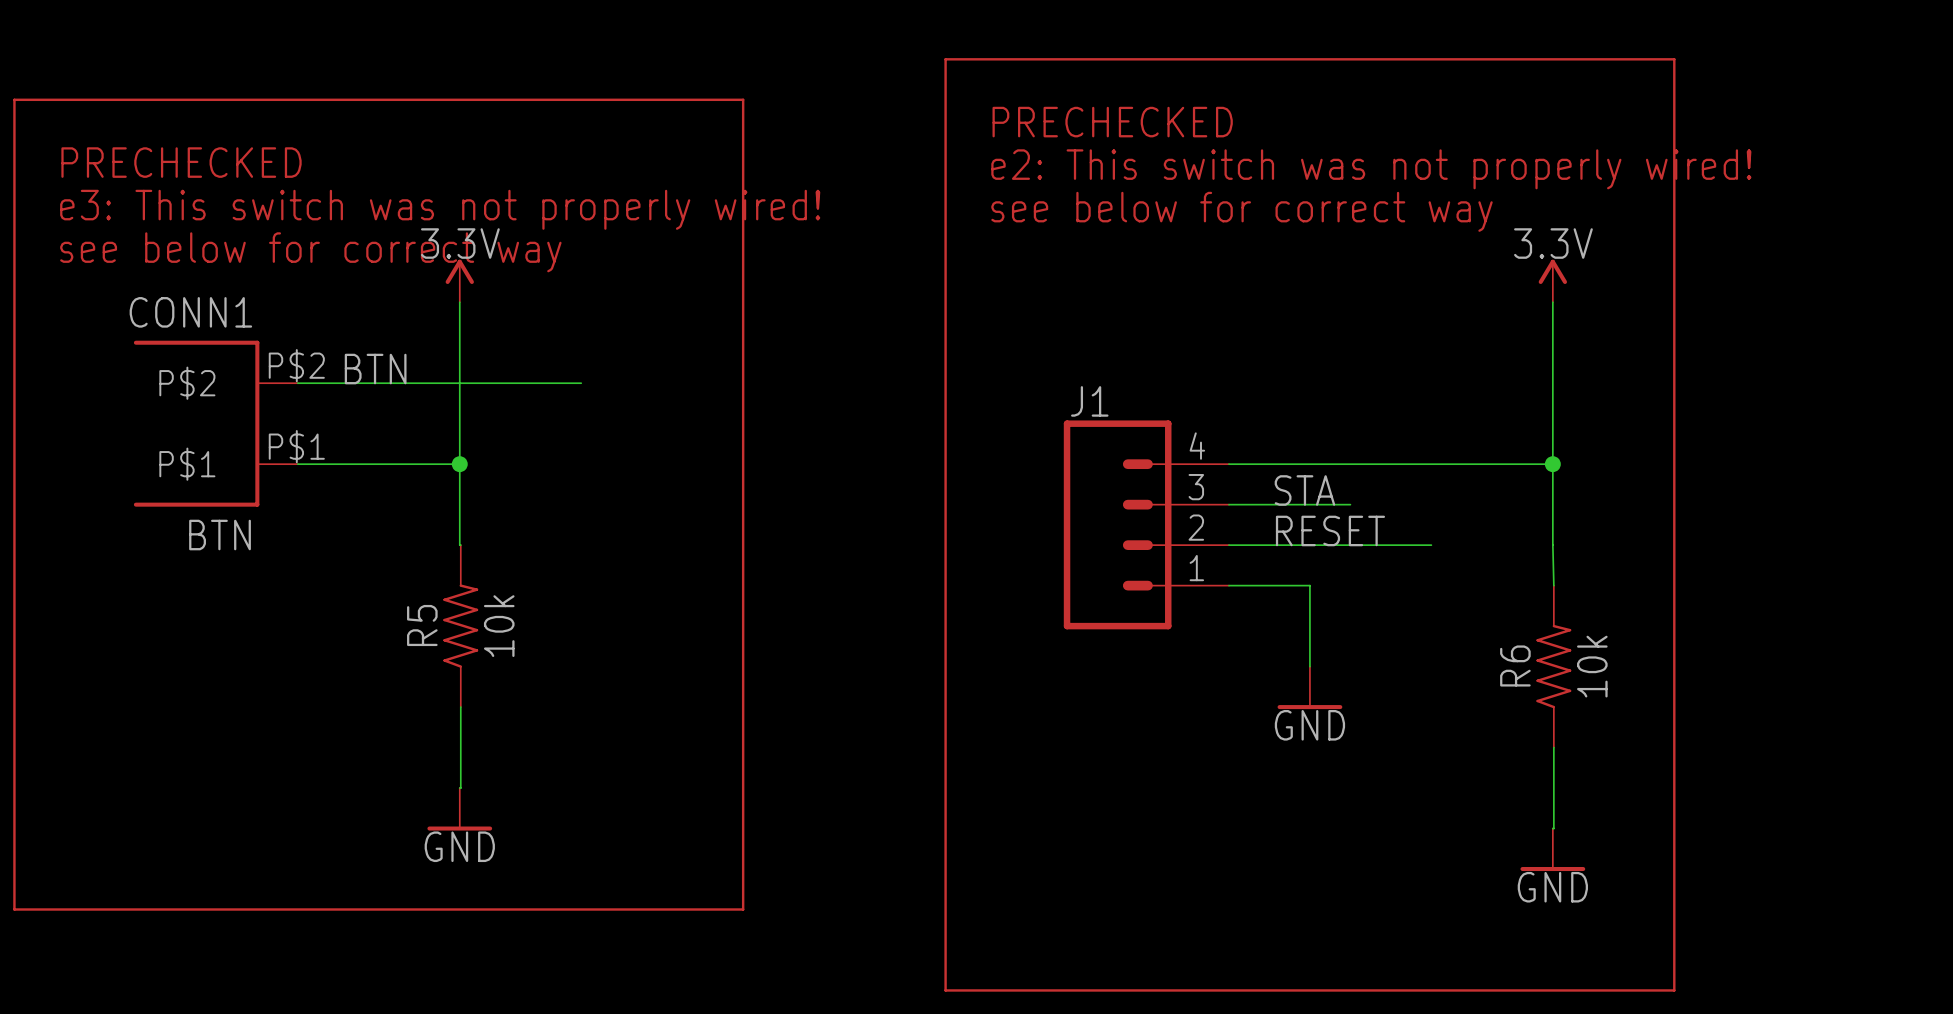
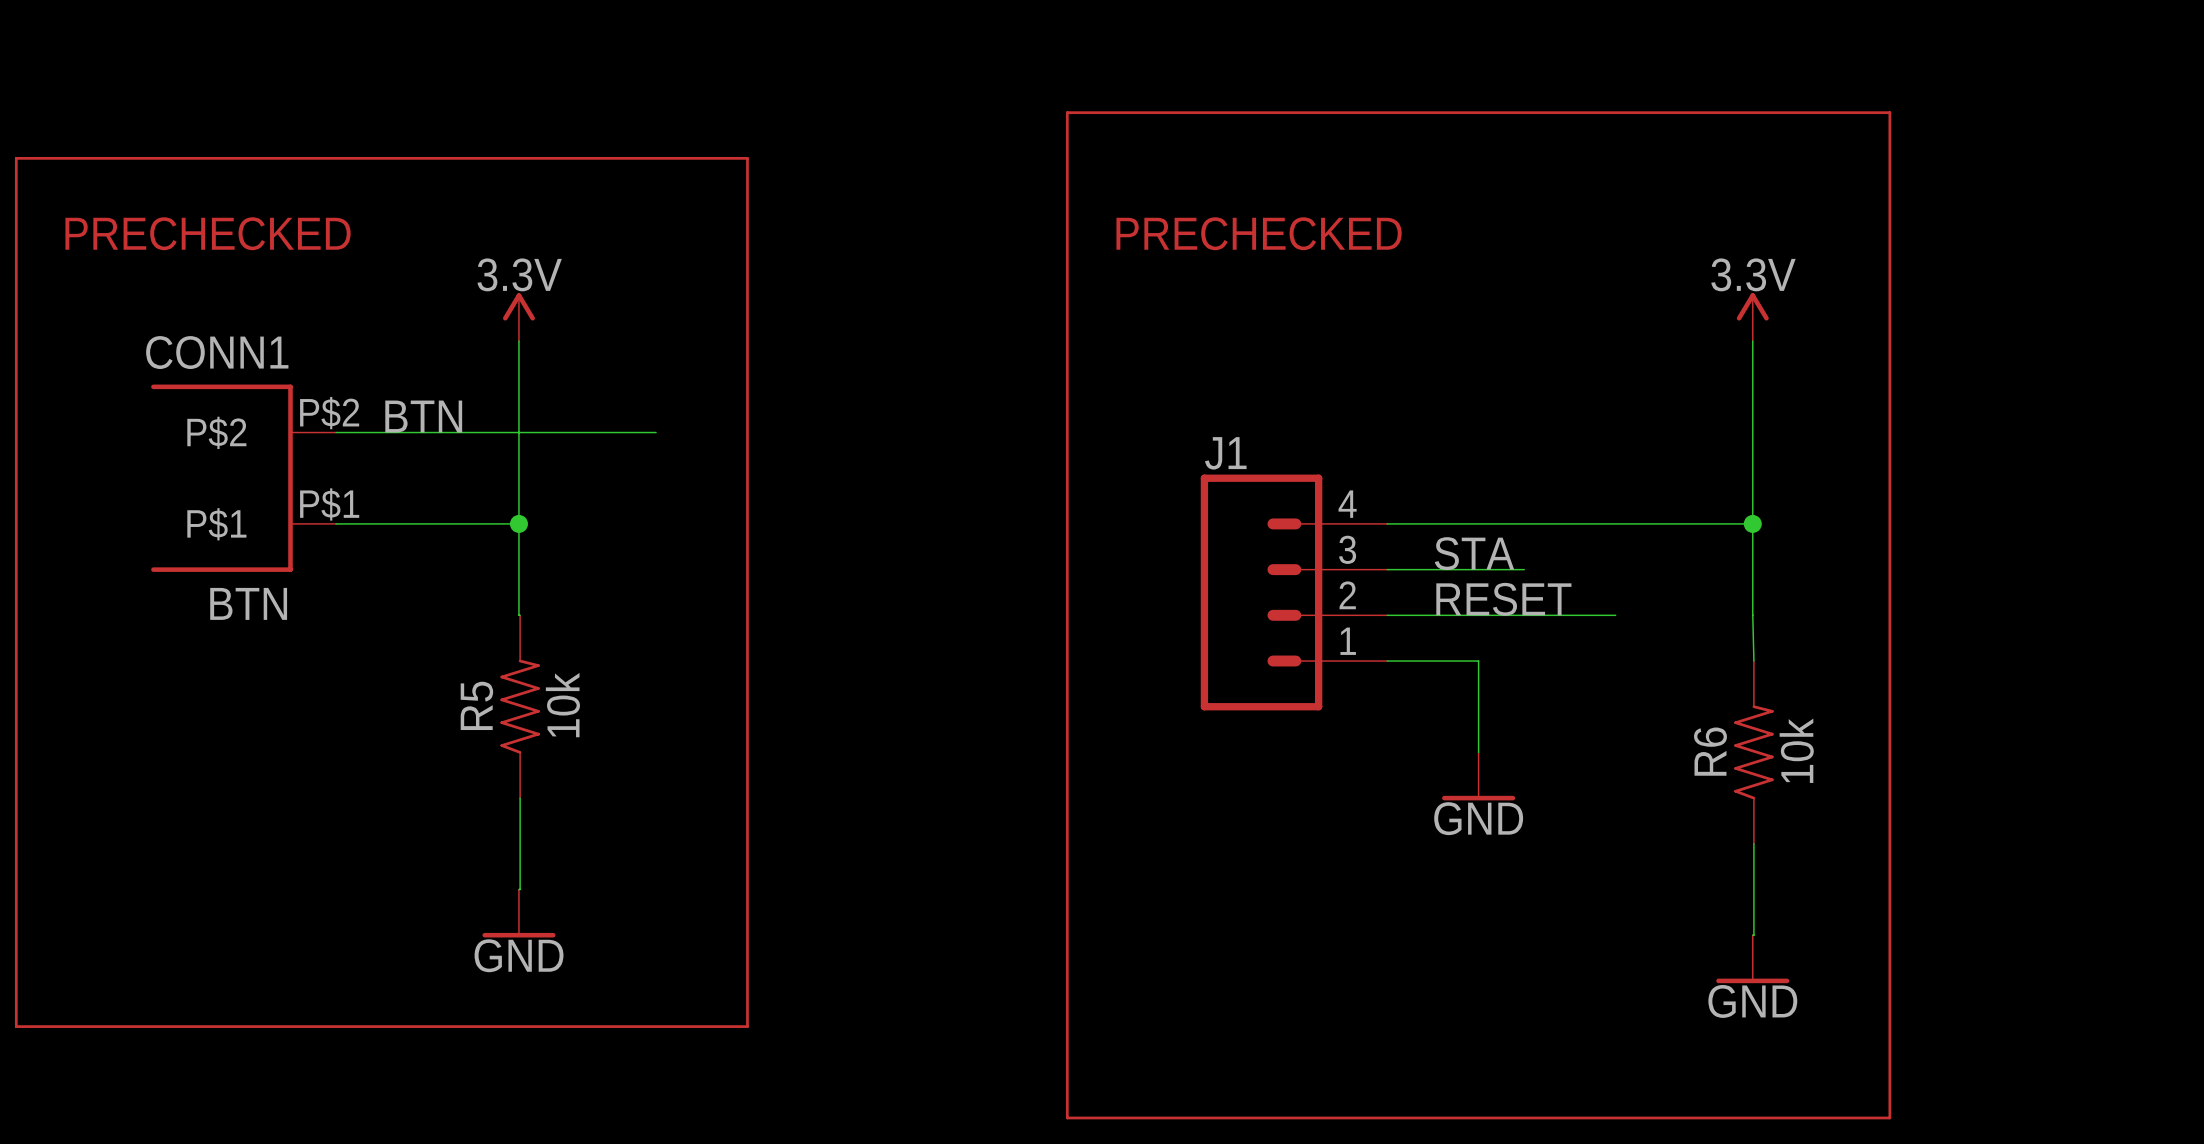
line: (945, 99) (945, 59) (1674, 59) (1674, 99) -> (1067, 112) (1889, 112)
text: PRECHECKED (1112, 122) -> none
line: (14, 140) (14, 99) (743, 99) (743, 909) (662, 909) -> (16, 158) (747, 158) (747, 1026)
text: PRECHECKED (181, 162) -> none
text: e2: This switch was not properly wired! (1371, 169) -> none
text: e3: This switch was not properly wired! (440, 209) -> PRECHECKED (208, 233)
text: see below for correct way (1242, 211) -> PRECHECKED (1259, 233)
text: see below for correct way (310, 252) -> none

